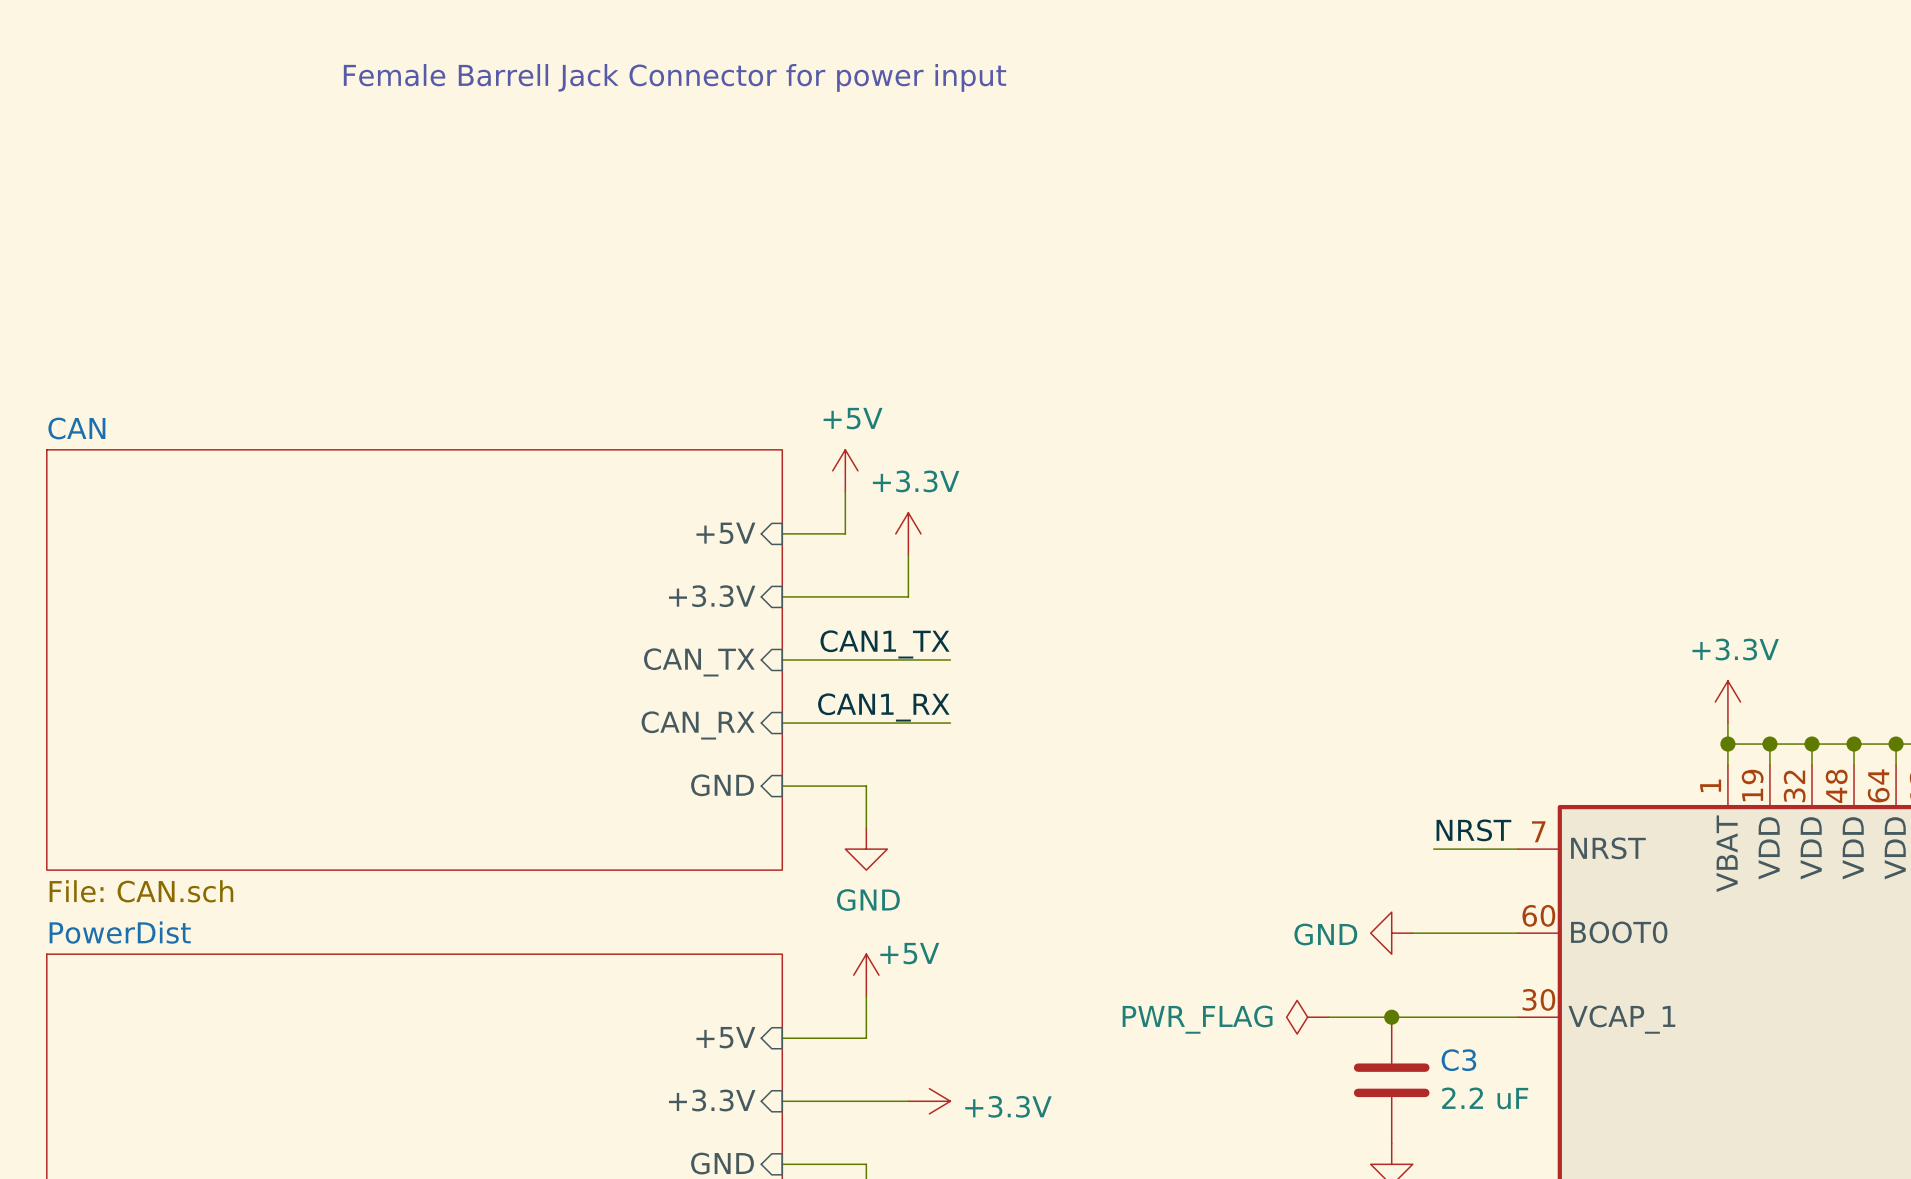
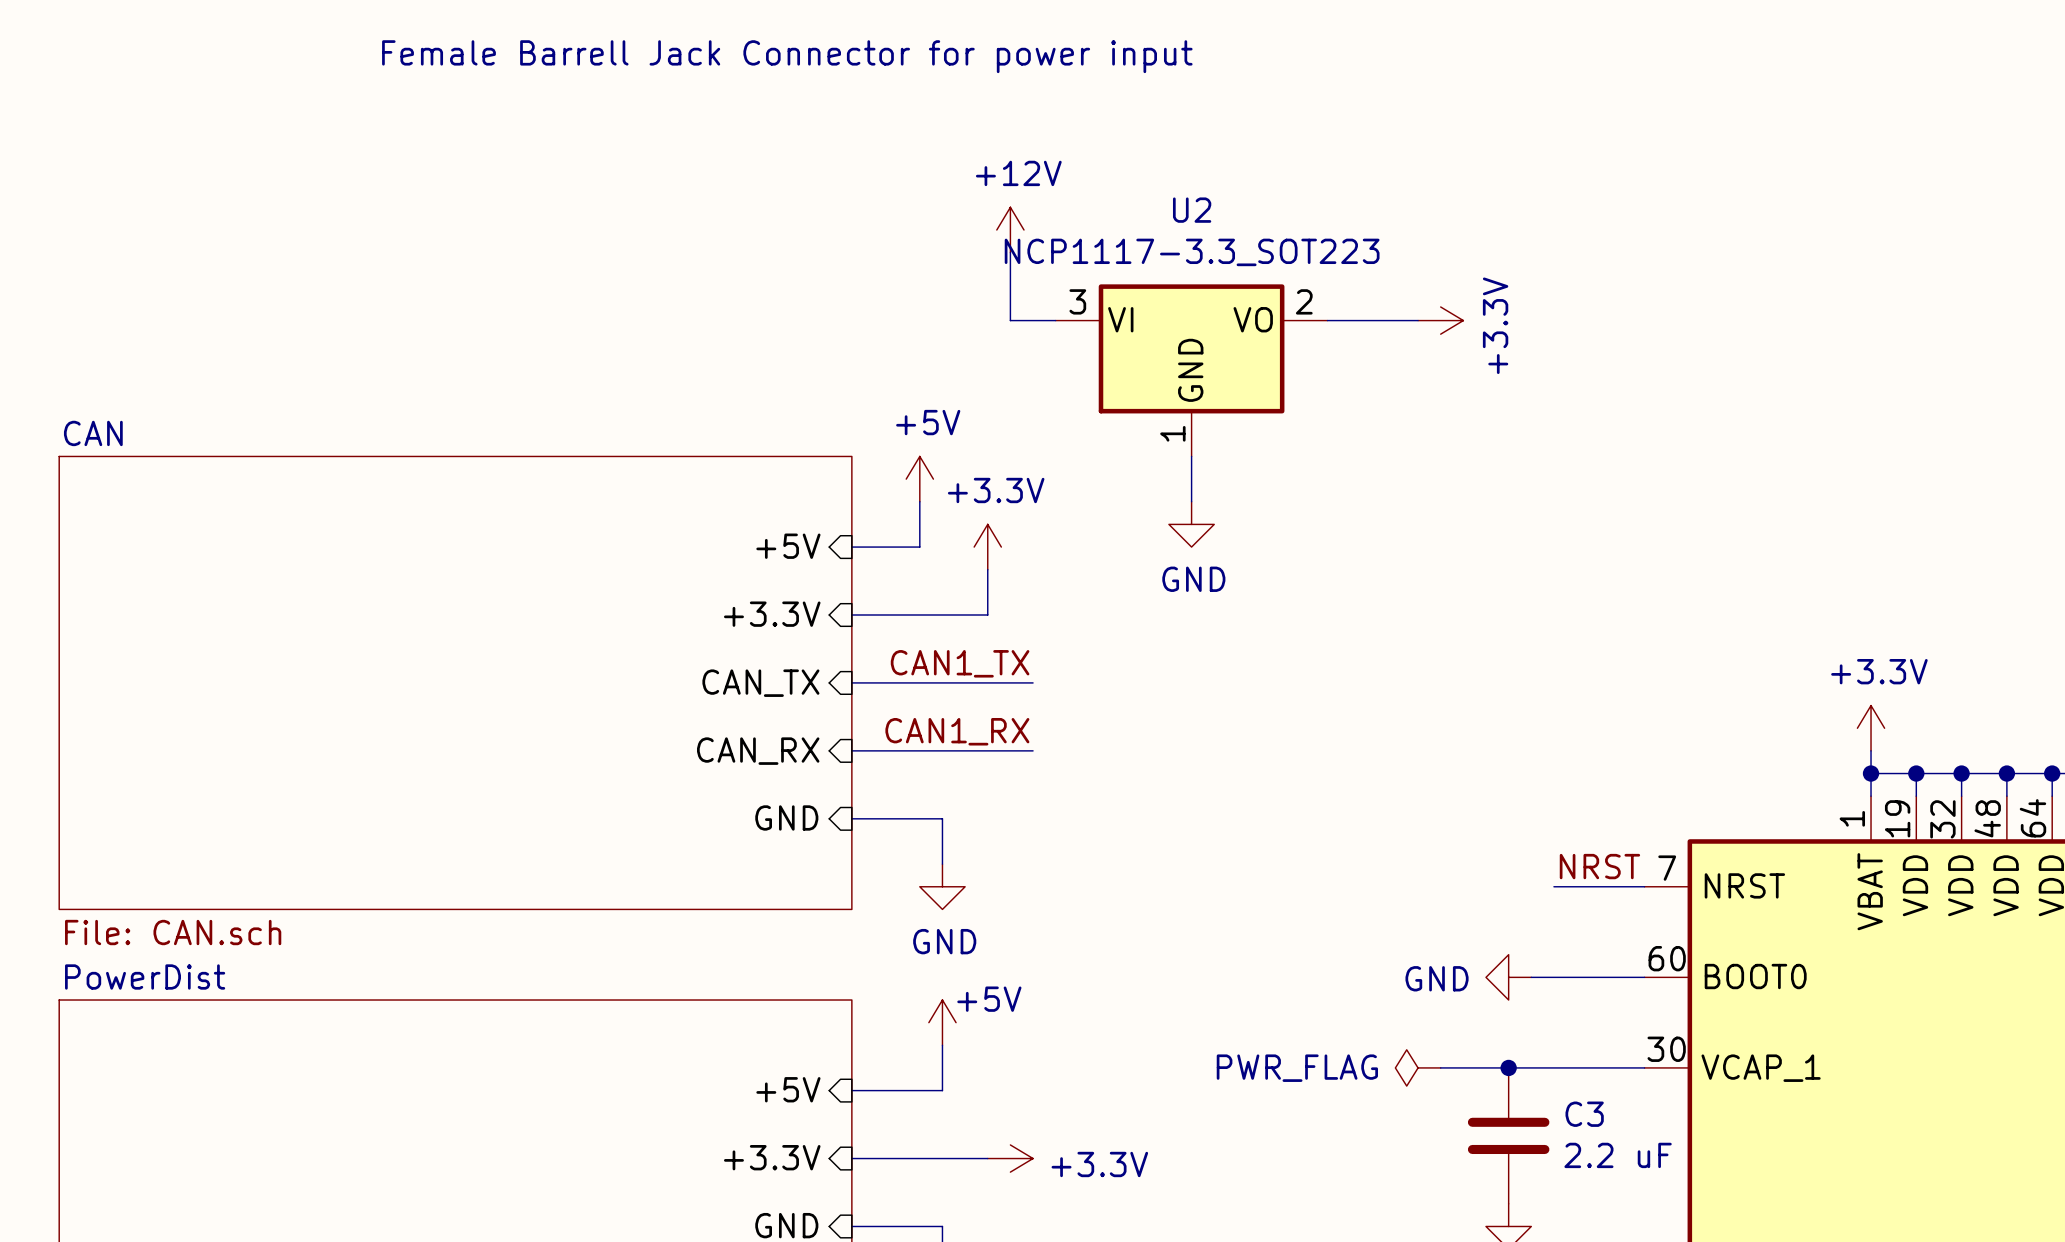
power symbol: none -> +12V (1010, 229)
wire: none -> (1010, 252) (1010, 320) (1055, 320)
wire: none -> (1327, 320) (1418, 320)
power symbol: none -> +3.3V (1440, 320)
U2: none -> NCP1117-3.3_SOT223 (1191, 370)
wire: none -> (1191, 456) (1191, 501)
power symbol: none -> GND (1191, 524)

